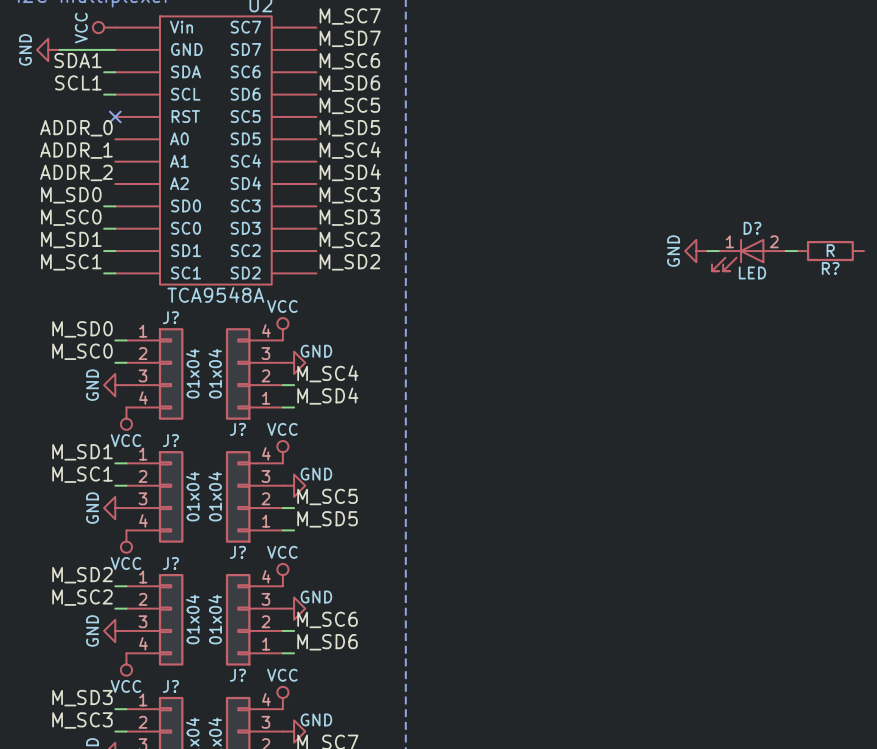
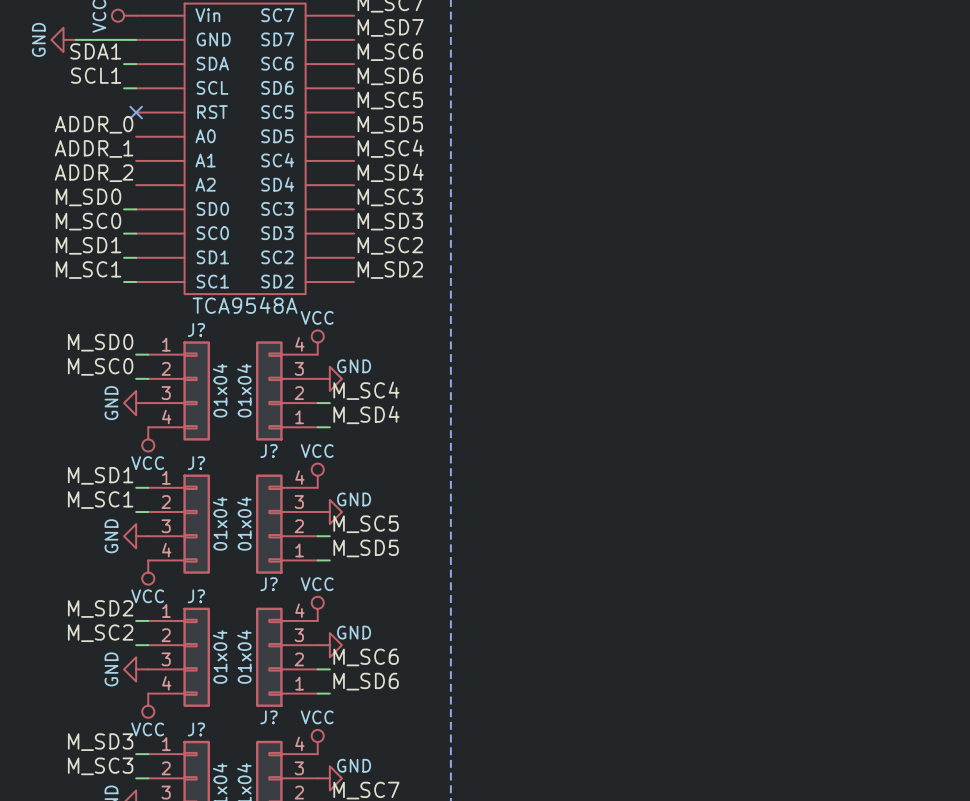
power symbol: GND (696, 251) -> none
wire: (707, 251) (718, 251) -> none
wire: (785, 251) (796, 251) -> none
R?: R (830, 251) -> none
D?: LED (748, 255) -> none

